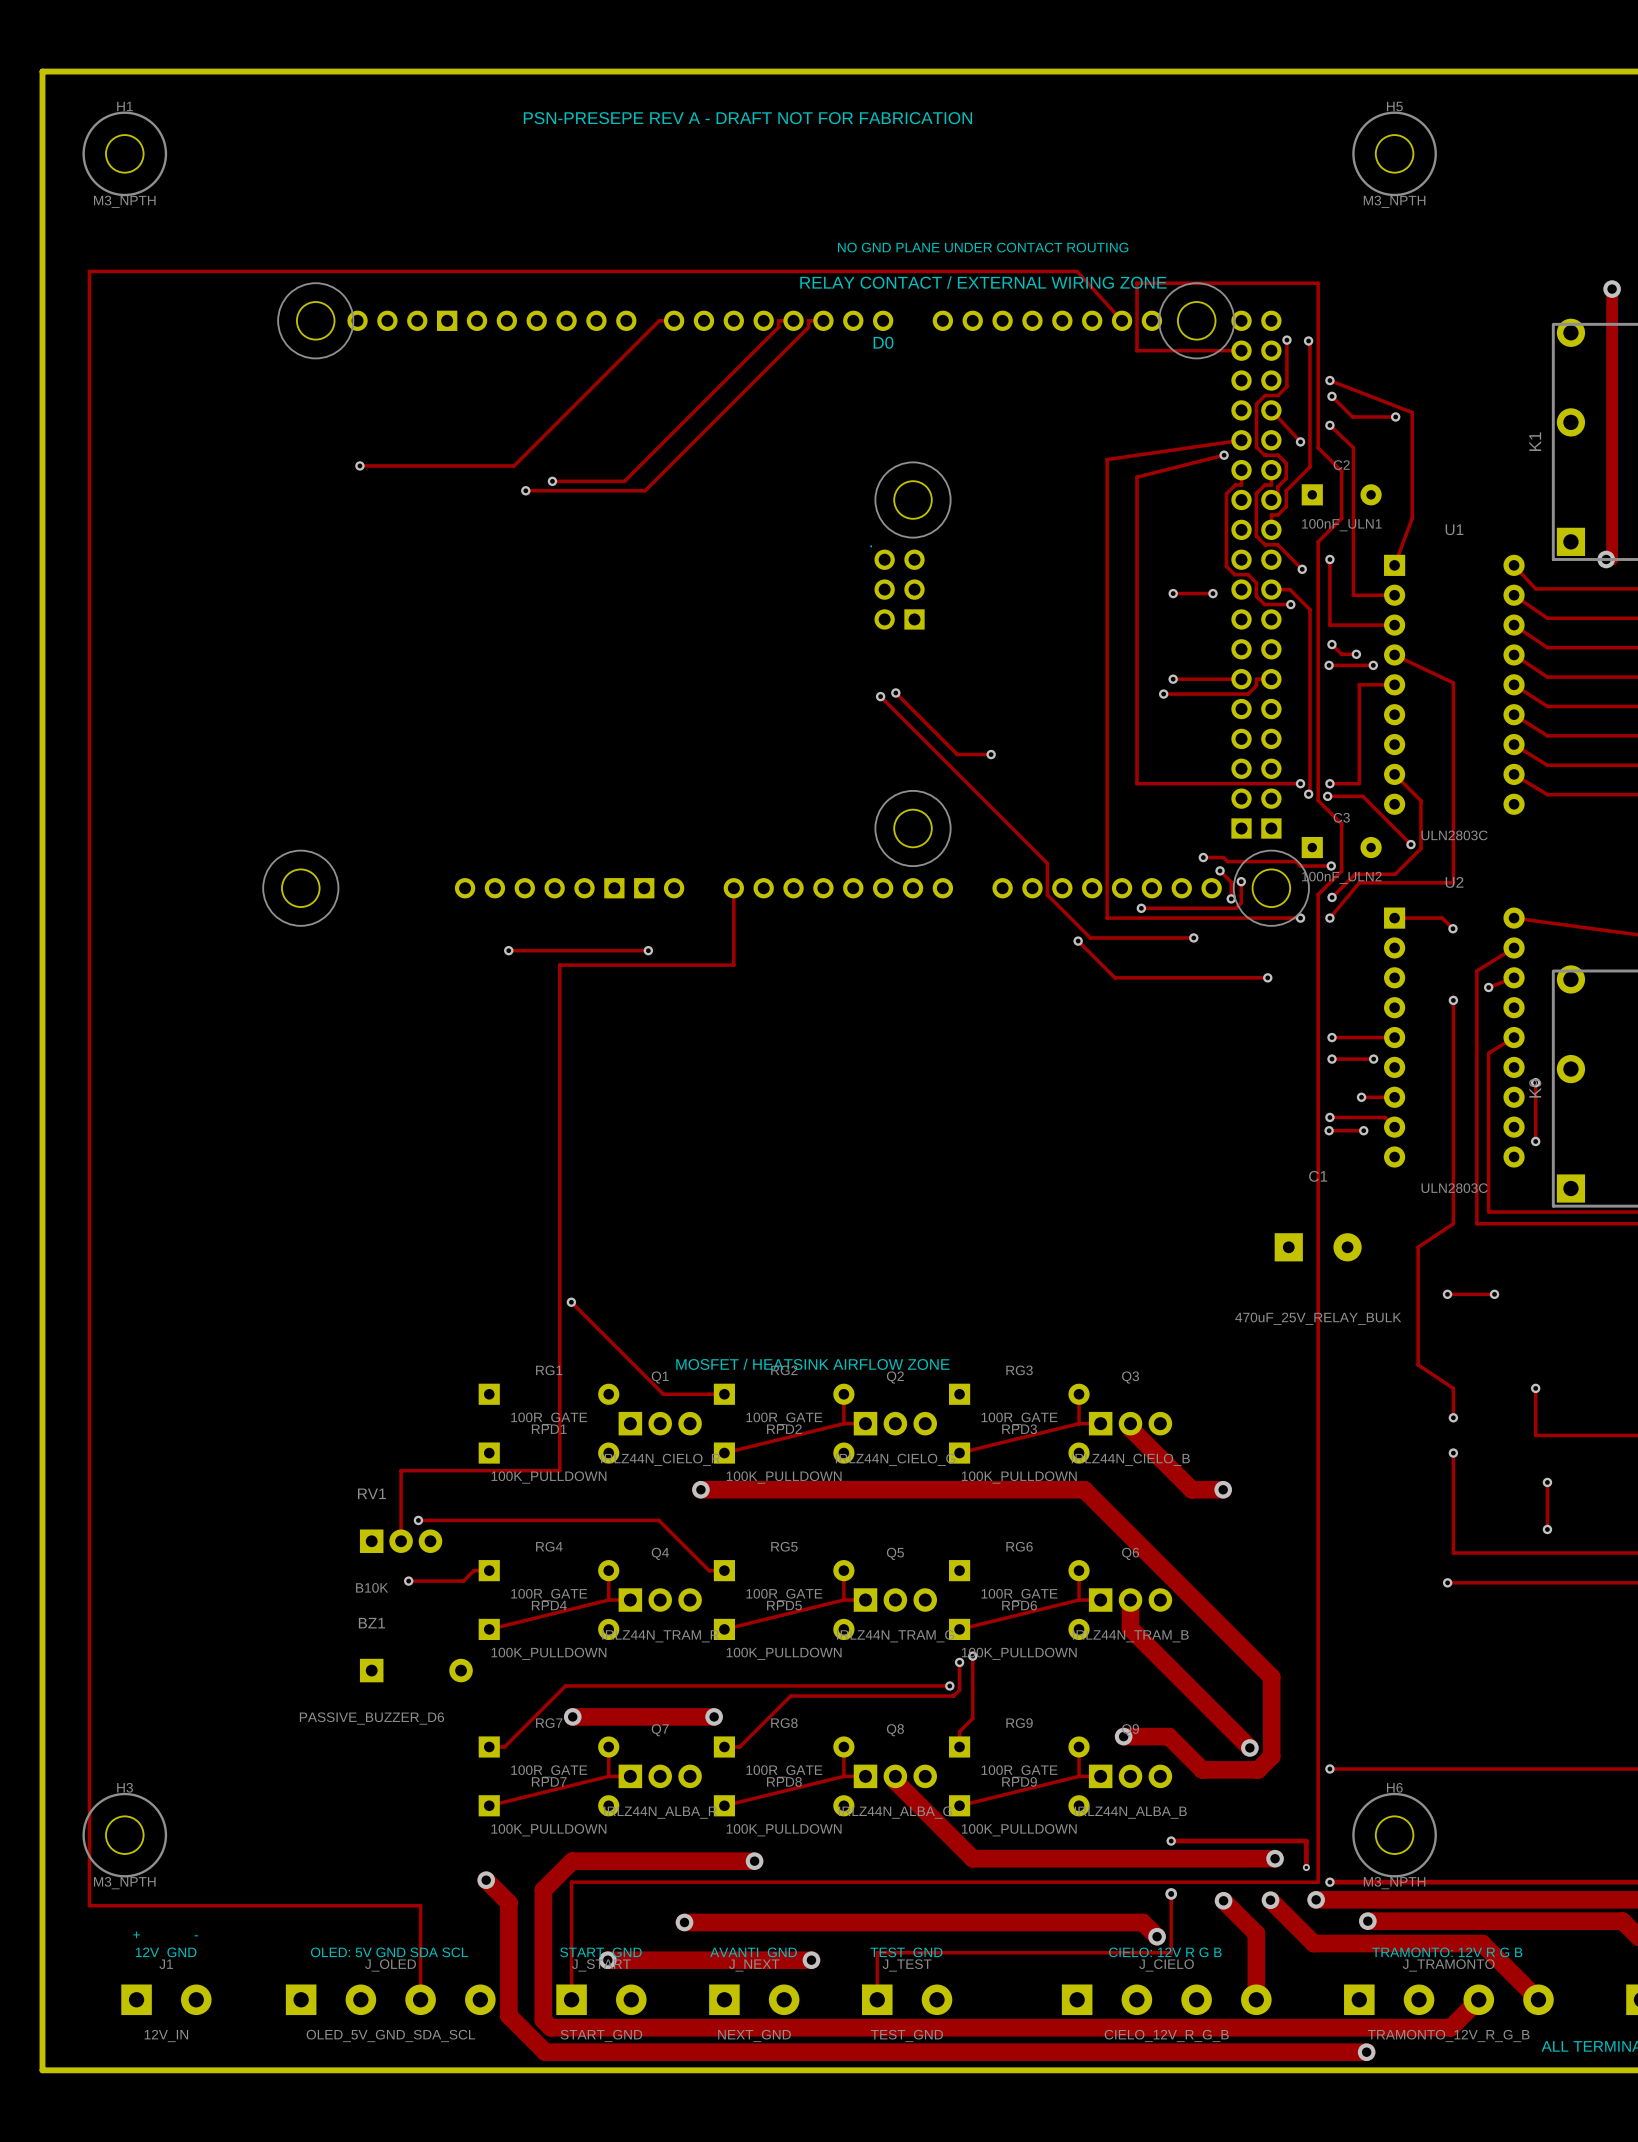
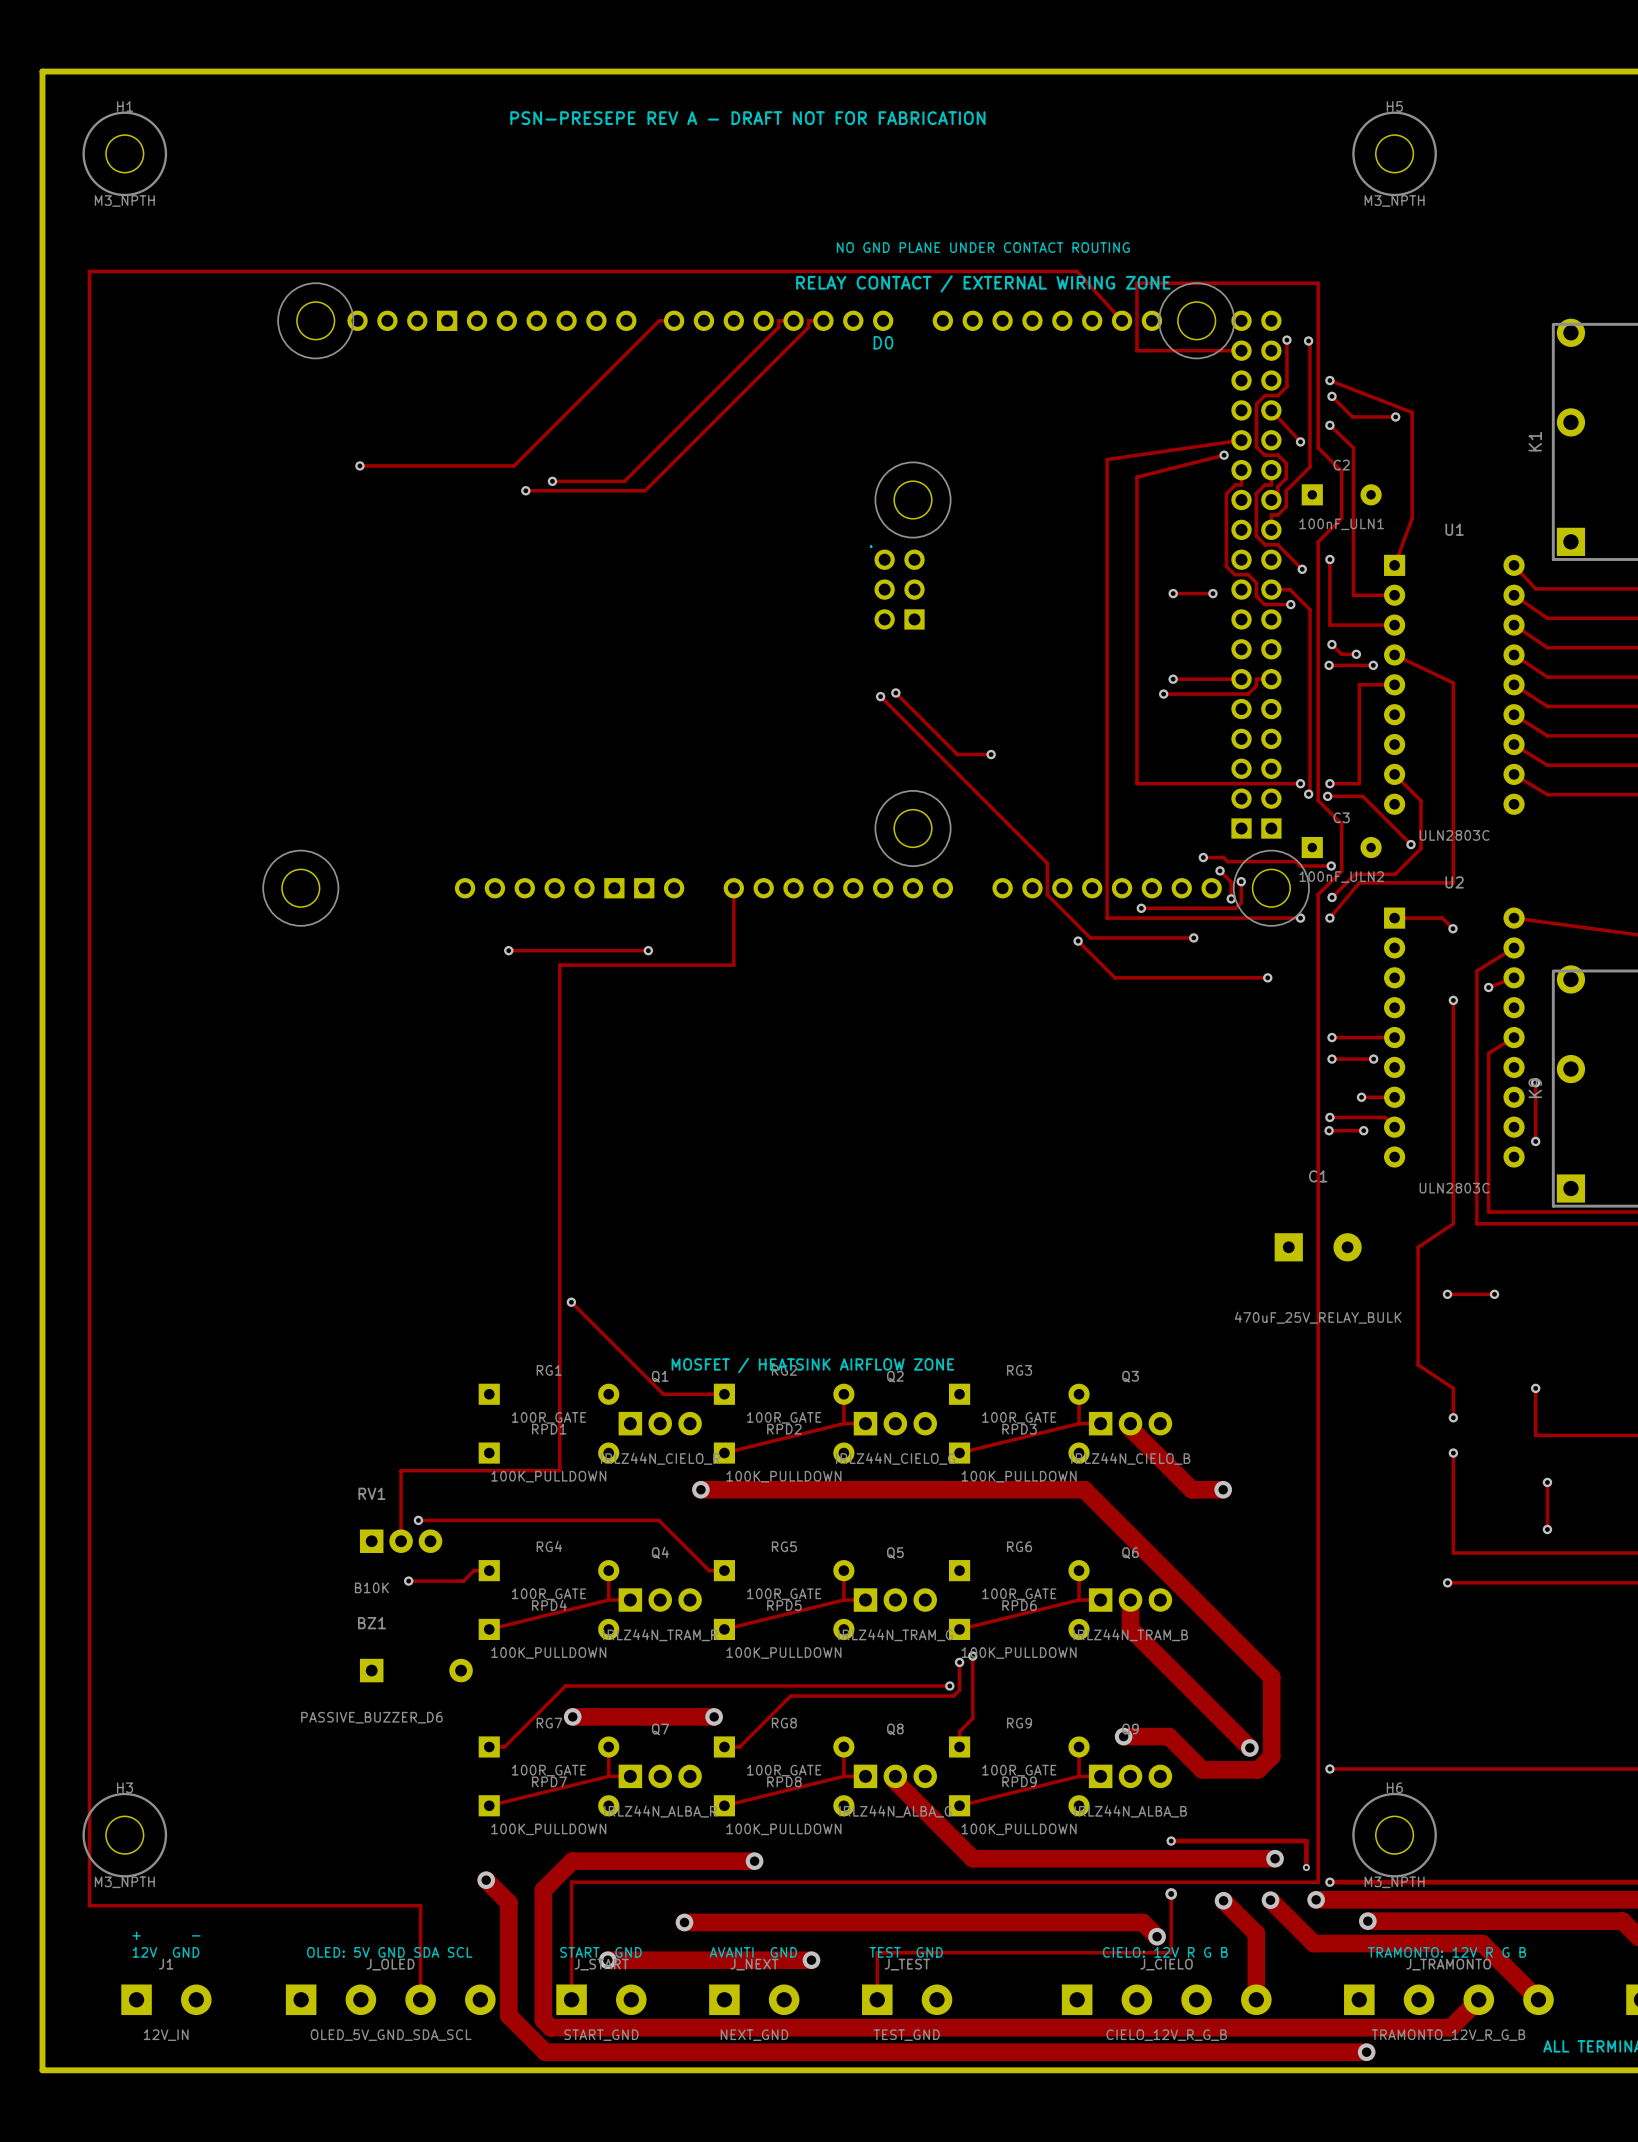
track: (1612, 289) (1612, 559) (1606, 559) -> none
via: (1612, 289) -> none
via: (1606, 559) -> none

